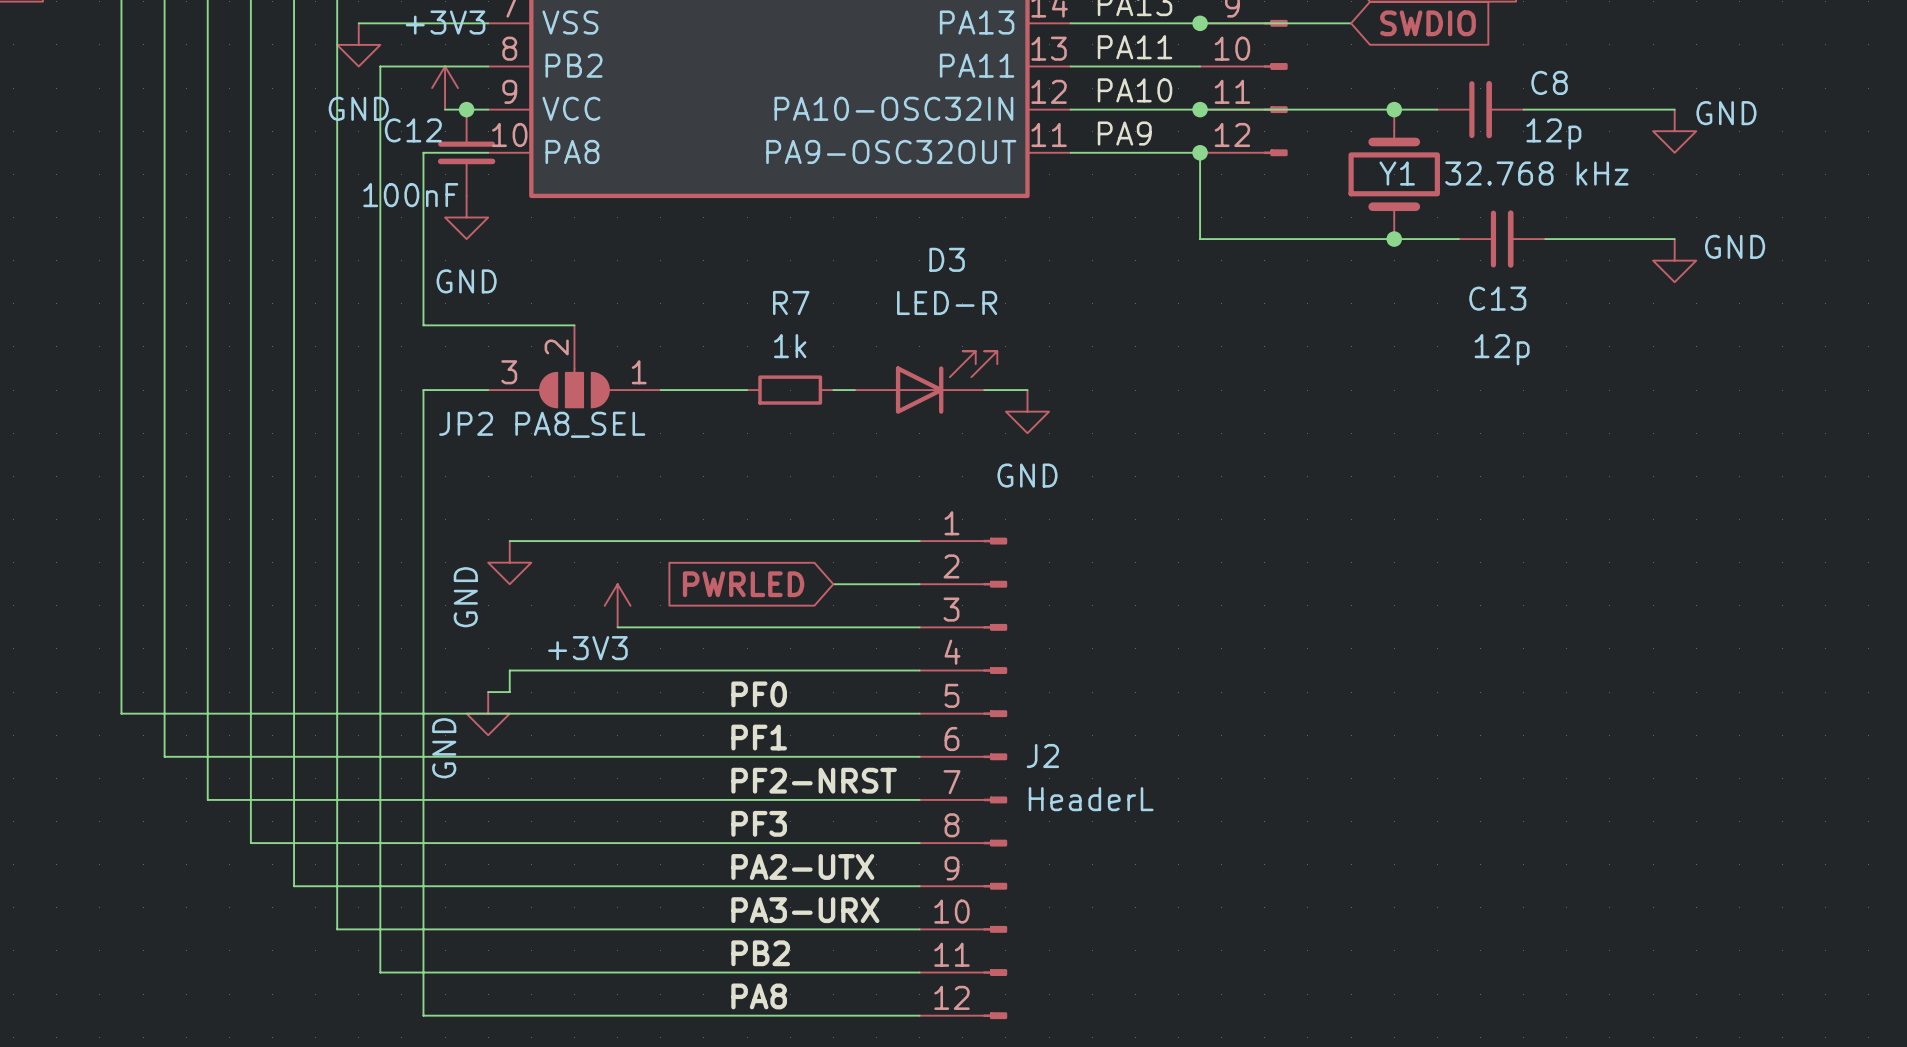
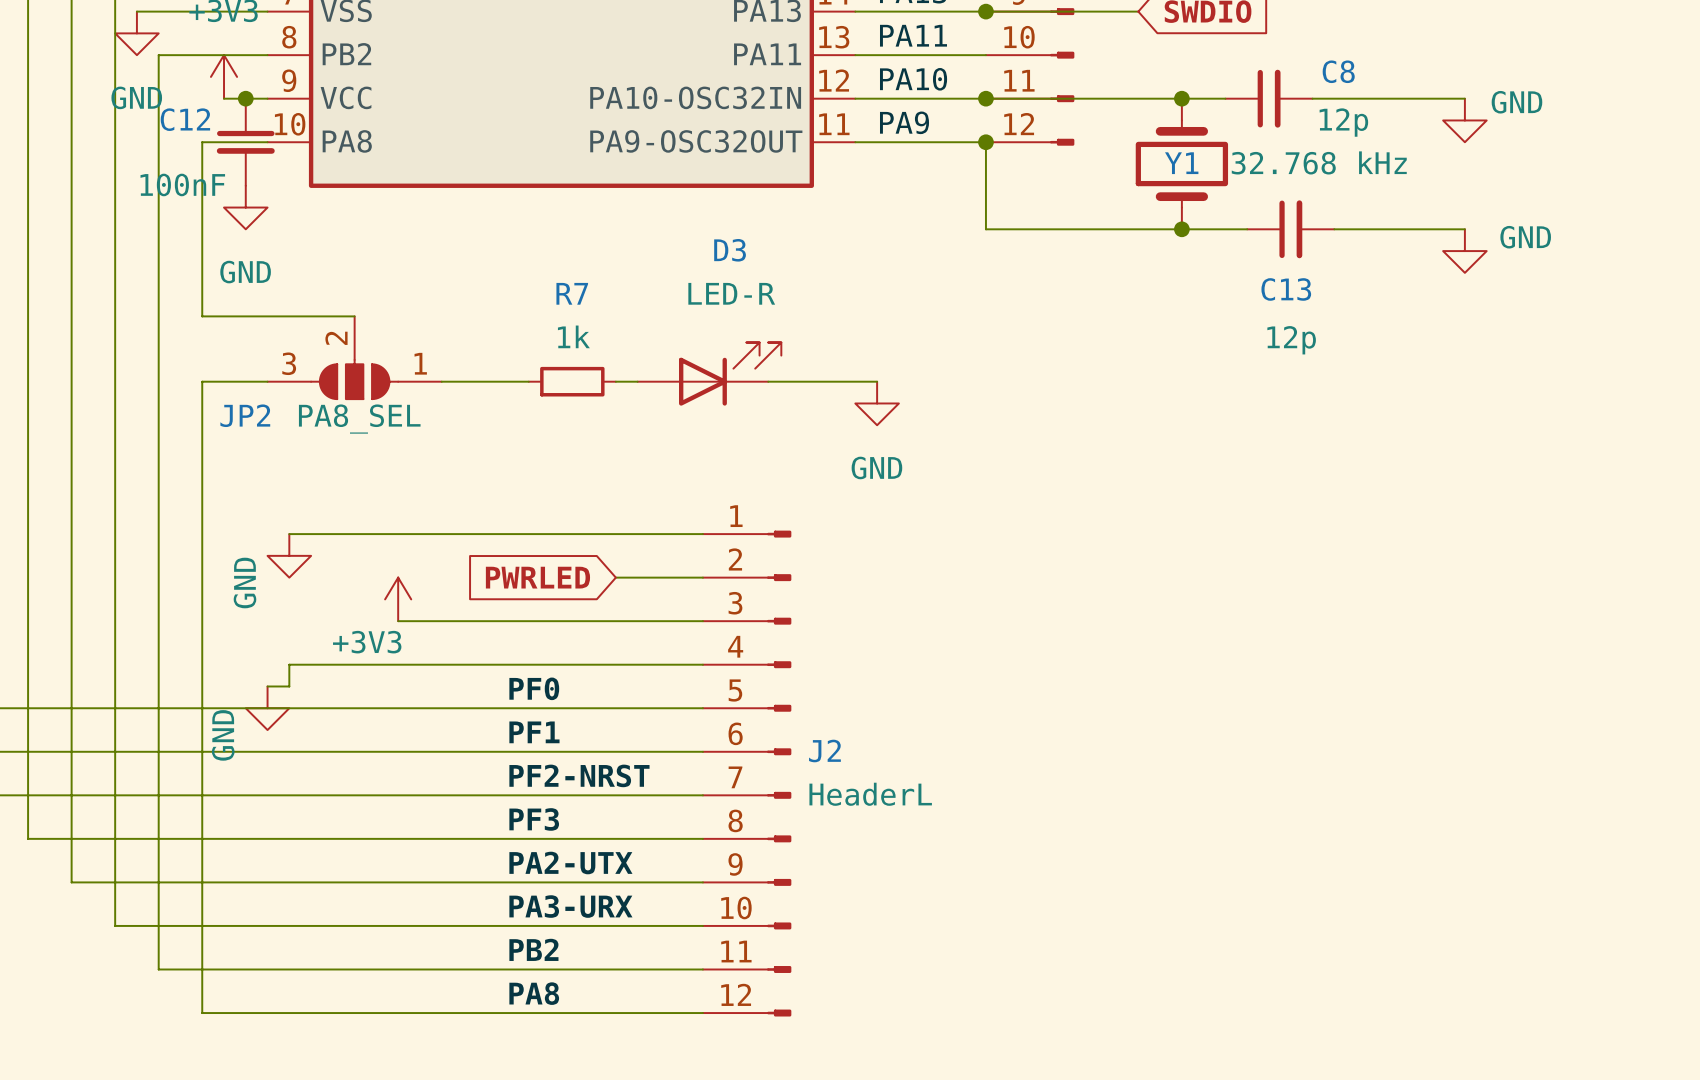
wire: none -> (811, 381) (877, 381)
power symbol position: GND (1027, 411) -> GND (877, 403)

